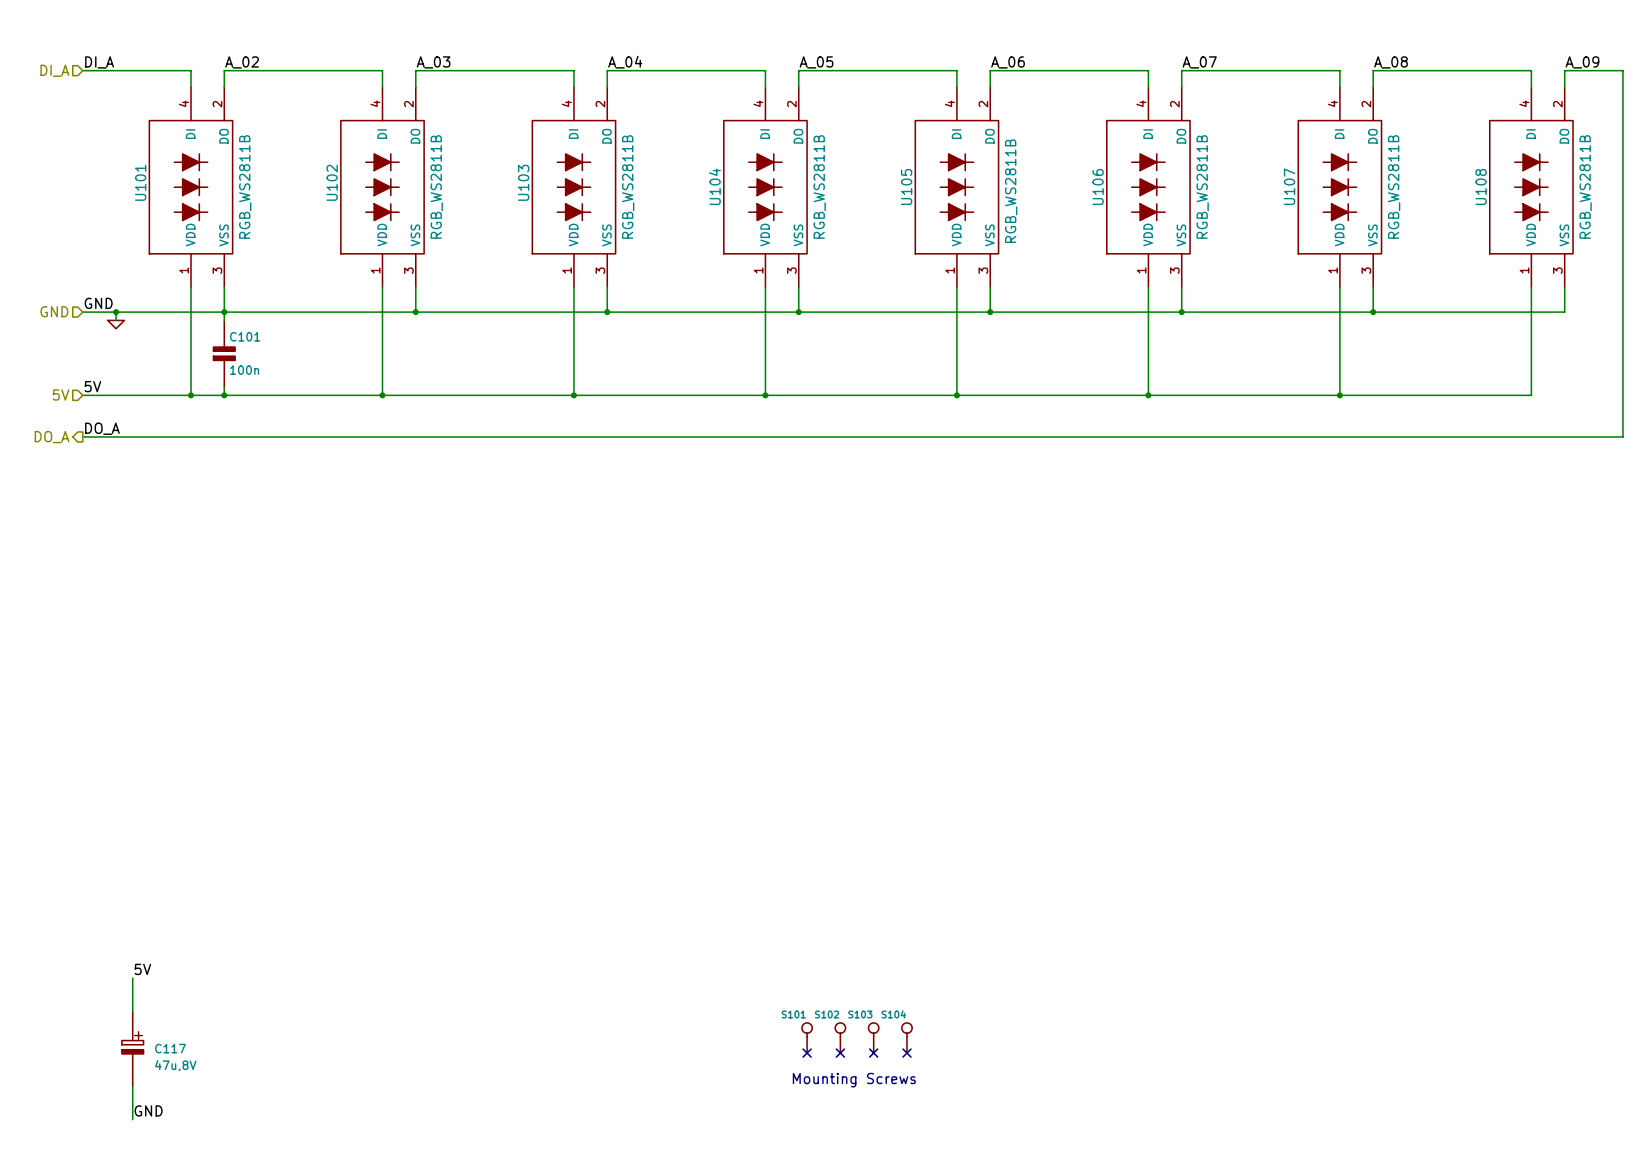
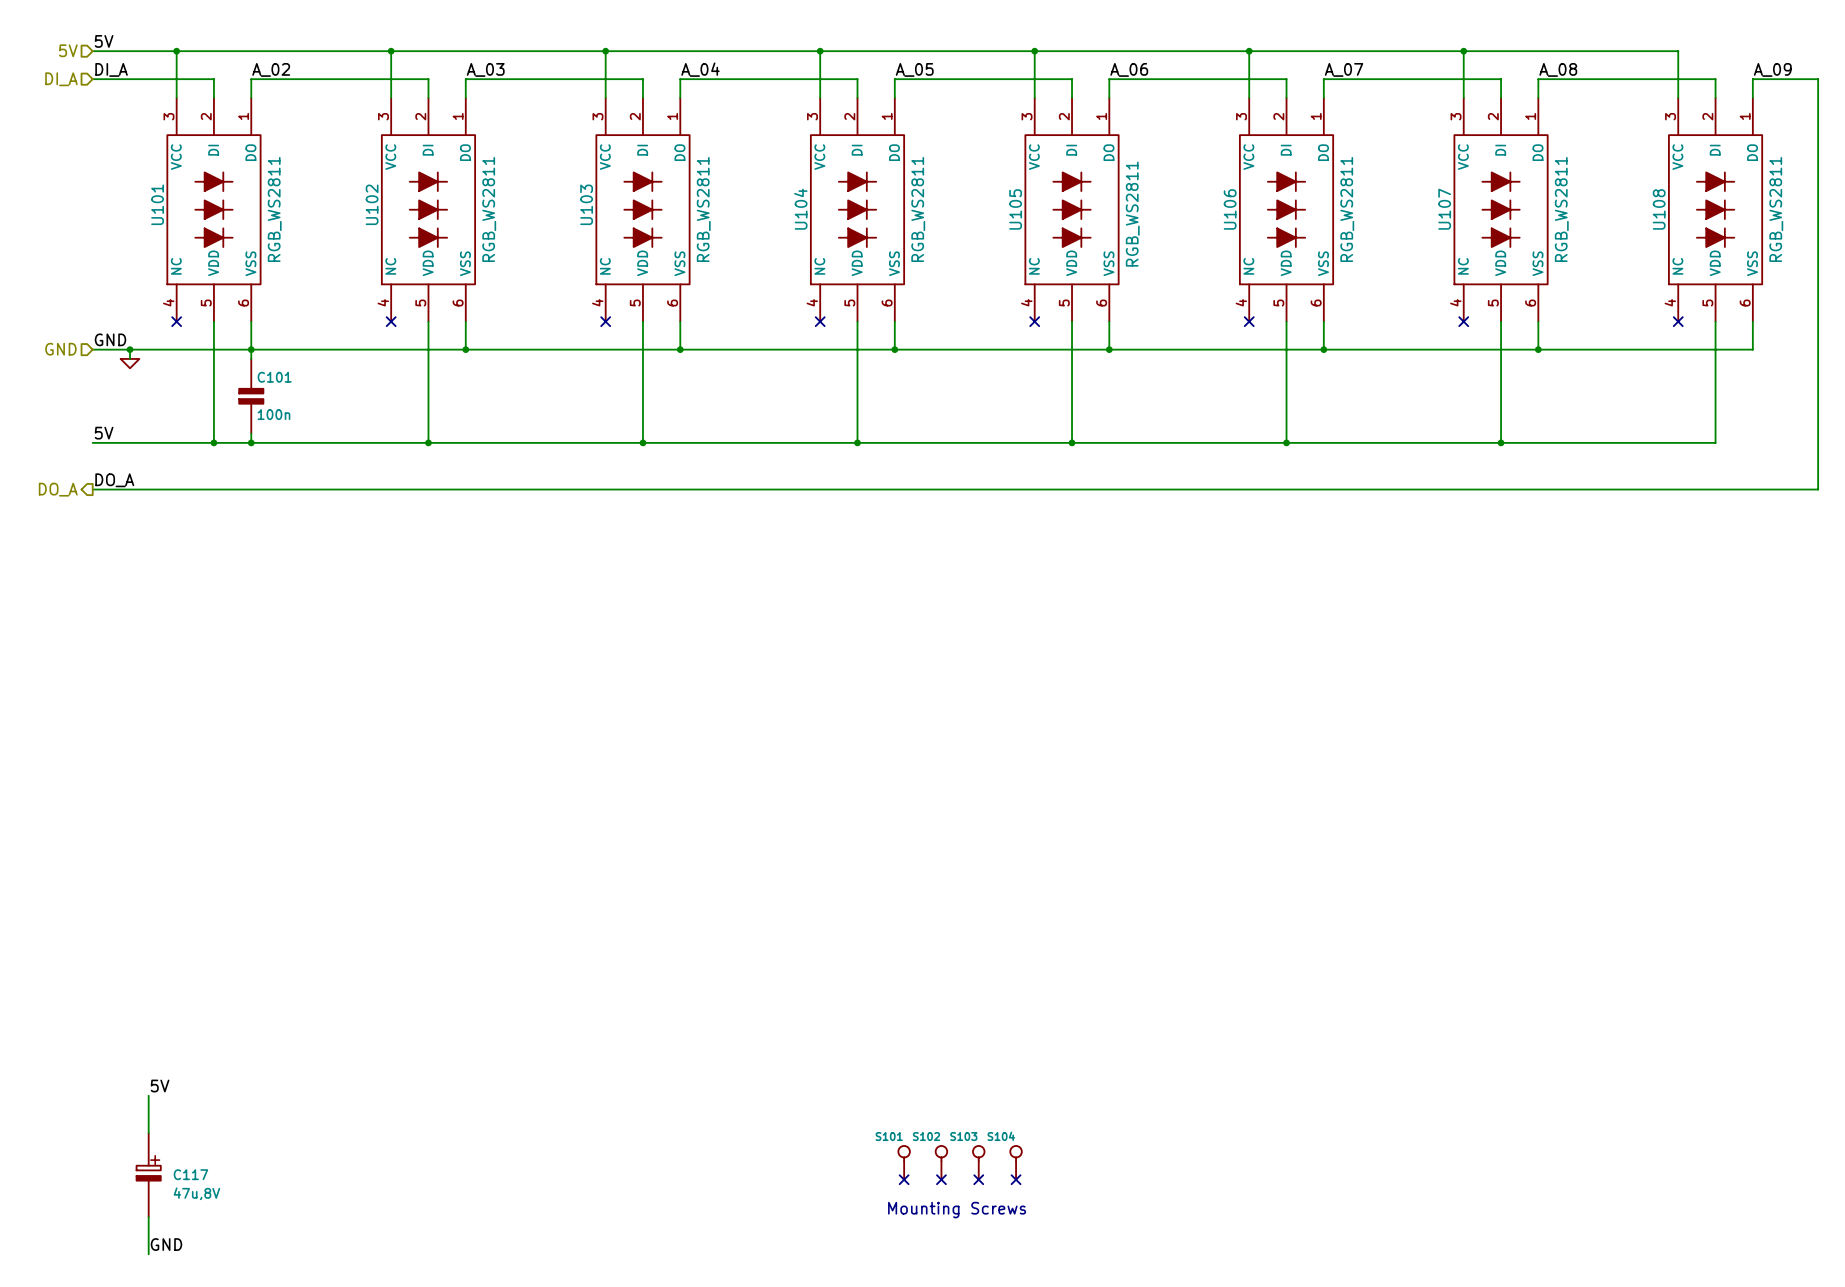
label: none -> 5V (104, 41)
hierarchical label: none -> 5V (68, 50)
wire: none -> (92, 51) (1678, 51) (1678, 97)
wire: none -> (176, 51) (176, 97)
junction: none -> (176, 51)
wire: none -> (391, 51) (391, 97)
junction: none -> (391, 51)
wire: none -> (605, 51) (605, 97)
junction: none -> (605, 51)
wire: none -> (820, 51) (820, 97)
junction: none -> (820, 51)
wire: none -> (1034, 51) (1034, 97)
junction: none -> (1034, 51)
wire: none -> (1249, 51) (1249, 97)
junction: none -> (1249, 51)
wire: none -> (1463, 51) (1463, 97)
junction: none -> (1463, 51)
U101 symbol: [149, 87, 233, 288] -> [167, 97, 261, 322]
U102 symbol: [340, 87, 425, 288] -> [381, 97, 476, 322]
U103 symbol: [532, 87, 616, 288] -> [596, 97, 690, 322]
U104 symbol: [723, 87, 808, 288] -> [810, 97, 905, 322]
U105 symbol: [915, 87, 999, 288] -> [1025, 97, 1119, 322]
U106 symbol: [1106, 87, 1191, 288] -> [1239, 97, 1334, 322]
U107 symbol: [1298, 87, 1382, 288] -> [1454, 97, 1548, 322]
U108 symbol: [1489, 87, 1574, 288] -> [1668, 97, 1763, 322]
U101 value: RGB_WS2811B (245, 186) -> RGB_WS2811 (274, 209)
U102 value: RGB_WS2811B (436, 186) -> RGB_WS2811 (489, 209)
U103 value: RGB_WS2811B (628, 186) -> RGB_WS2811 (703, 209)
U104 value: RGB_WS2811B (819, 186) -> RGB_WS2811 (918, 209)
U106 value: RGB_WS2811B (1202, 186) -> RGB_WS2811 (1347, 209)
U107 value: RGB_WS2811B (1394, 186) -> RGB_WS2811 (1561, 209)
U108 value: RGB_WS2811B (1585, 186) -> RGB_WS2811 (1776, 209)
U105 value: RGB_WS2811B (1011, 191) -> RGB_WS2811 (1132, 214)
no-connect mark: none -> (176, 321)
no-connect mark: none -> (391, 321)
no-connect mark: none -> (605, 321)
no-connect mark: none -> (820, 321)
no-connect mark: none -> (1034, 321)
no-connect mark: none -> (1249, 321)
no-connect mark: none -> (1463, 321)
no-connect mark: none -> (1678, 321)
hierarchical label: 5V (61, 394) -> none

